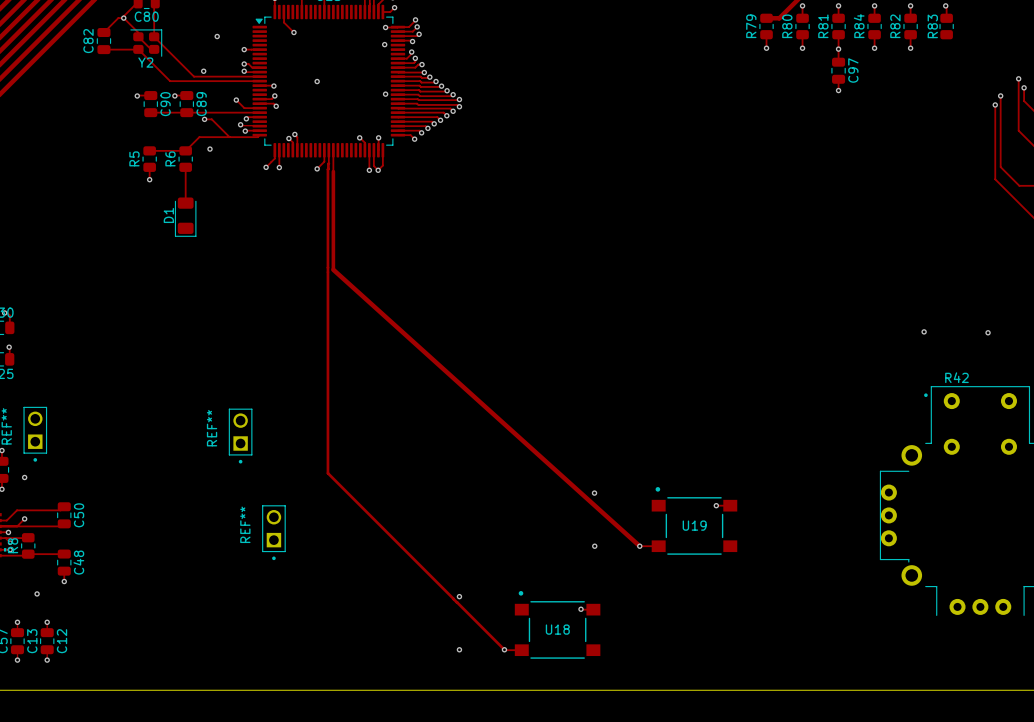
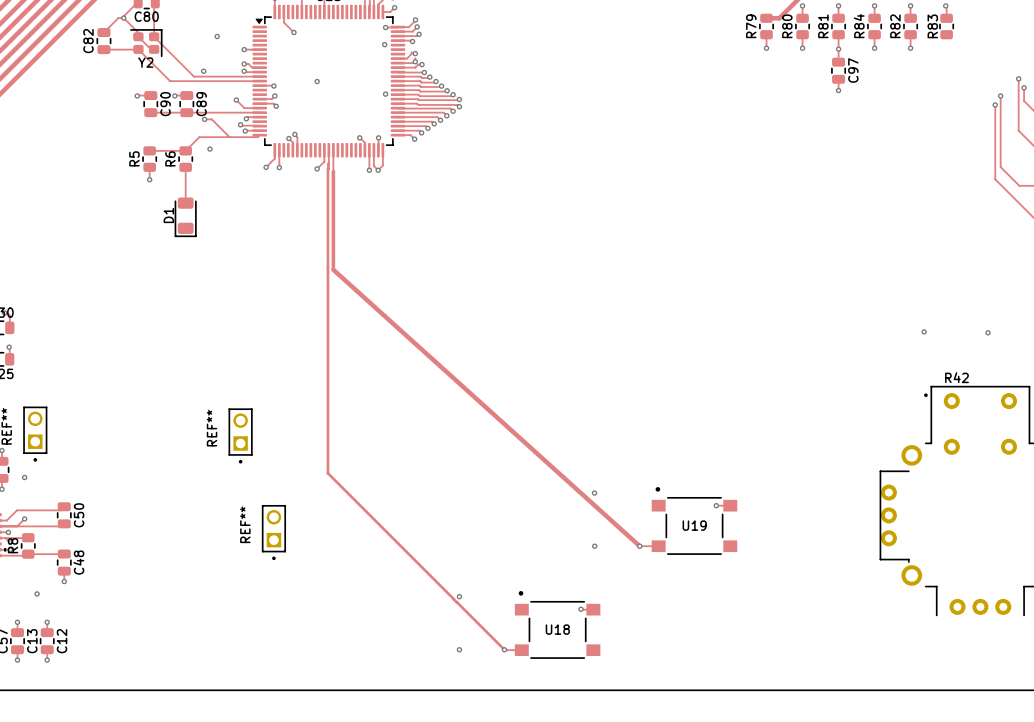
via: (411, 52) -> none
via: none -> (415, 53)
via: (415, 58) -> none
via: none -> (415, 61)

